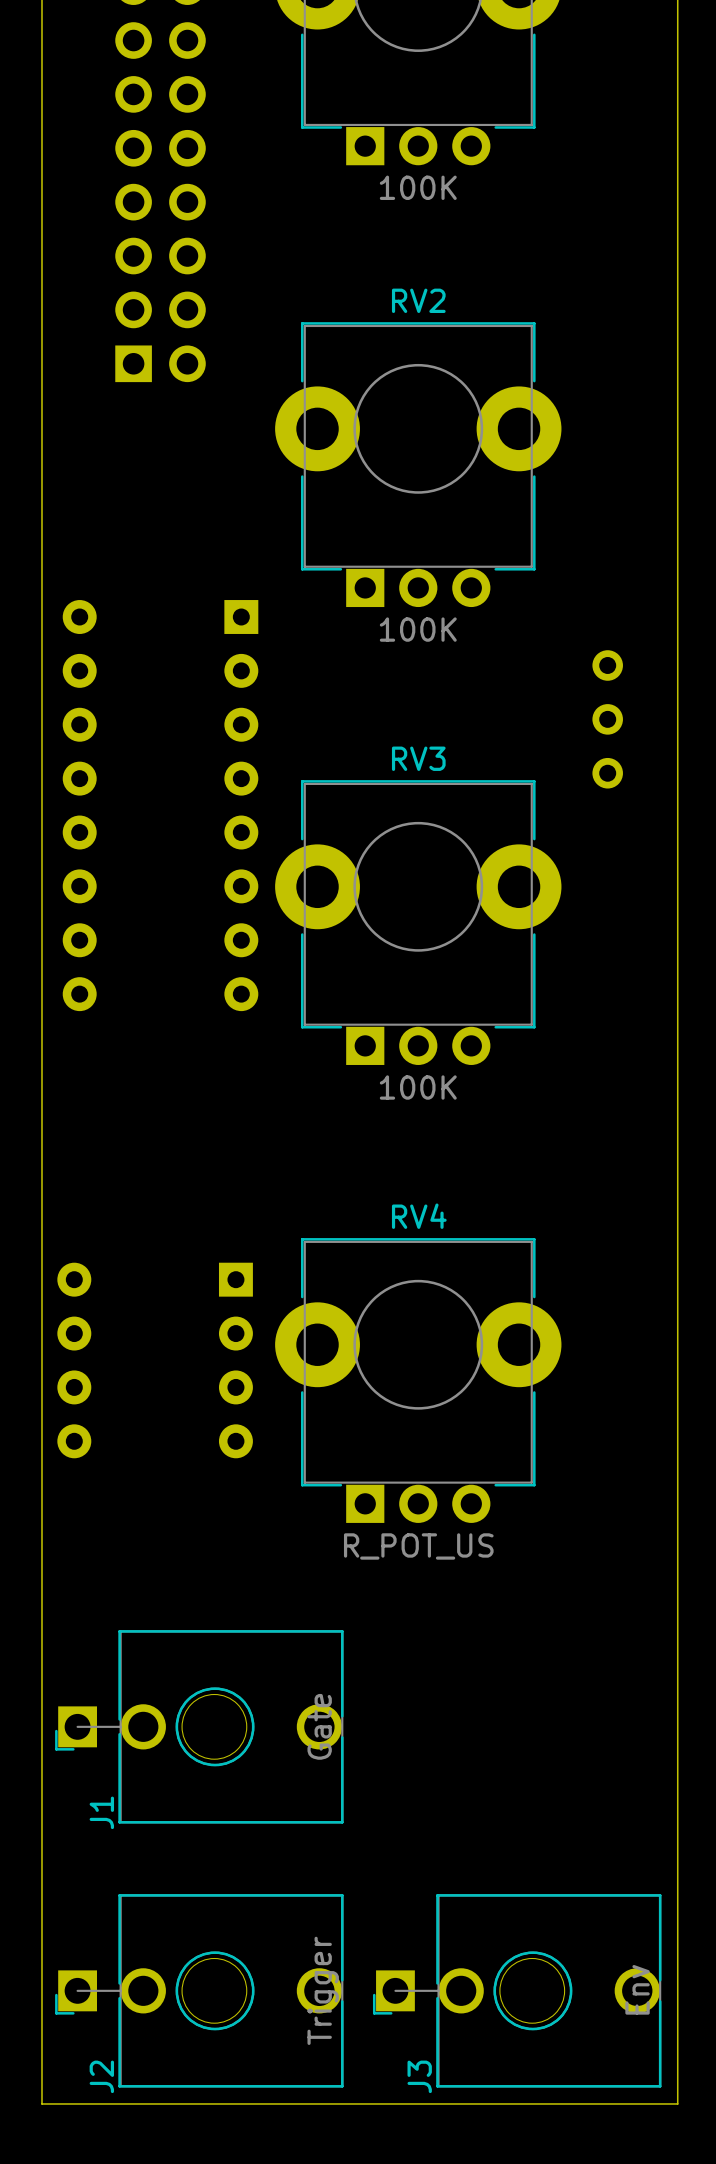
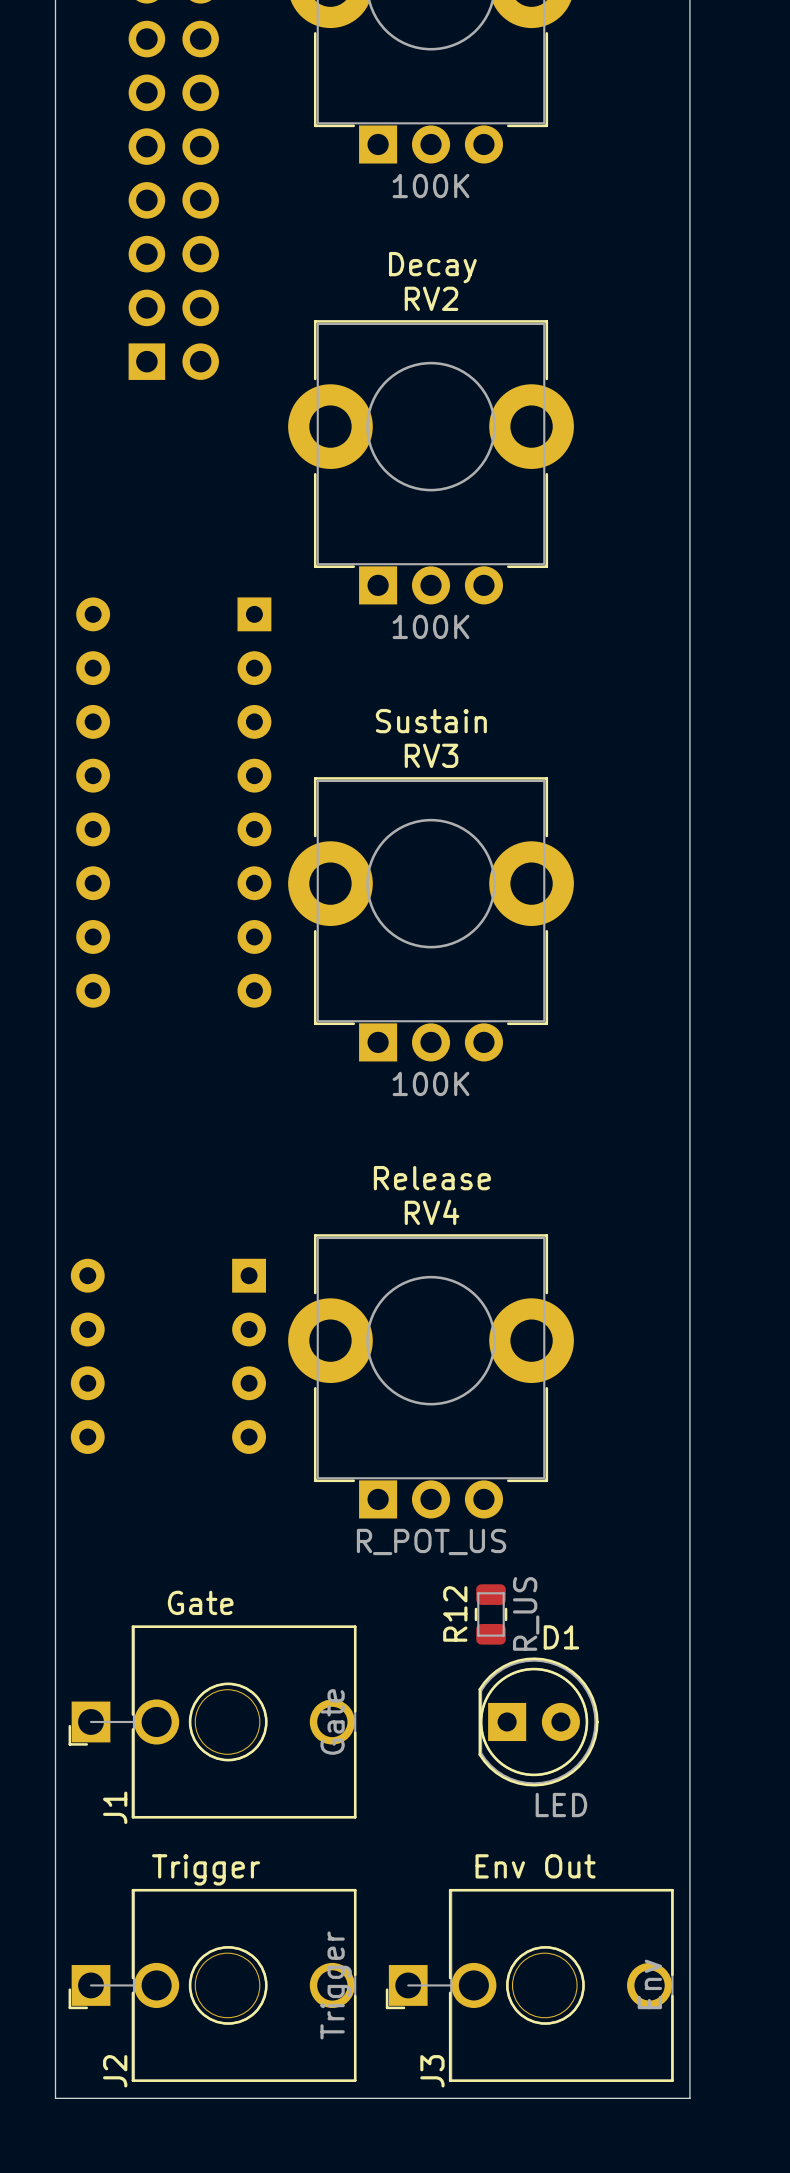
text: none -> Decay (432, 267)
part: (607, 719) -> none
text: none -> Sustain (431, 721)
text: none -> Release (432, 1178)
text: none -> Gate (200, 1602)
R12: none -> R_US (491, 1614)
D1: none -> LED (538, 1721)
text: none -> Env Out (535, 1866)
text: none -> Trigger (206, 1869)

